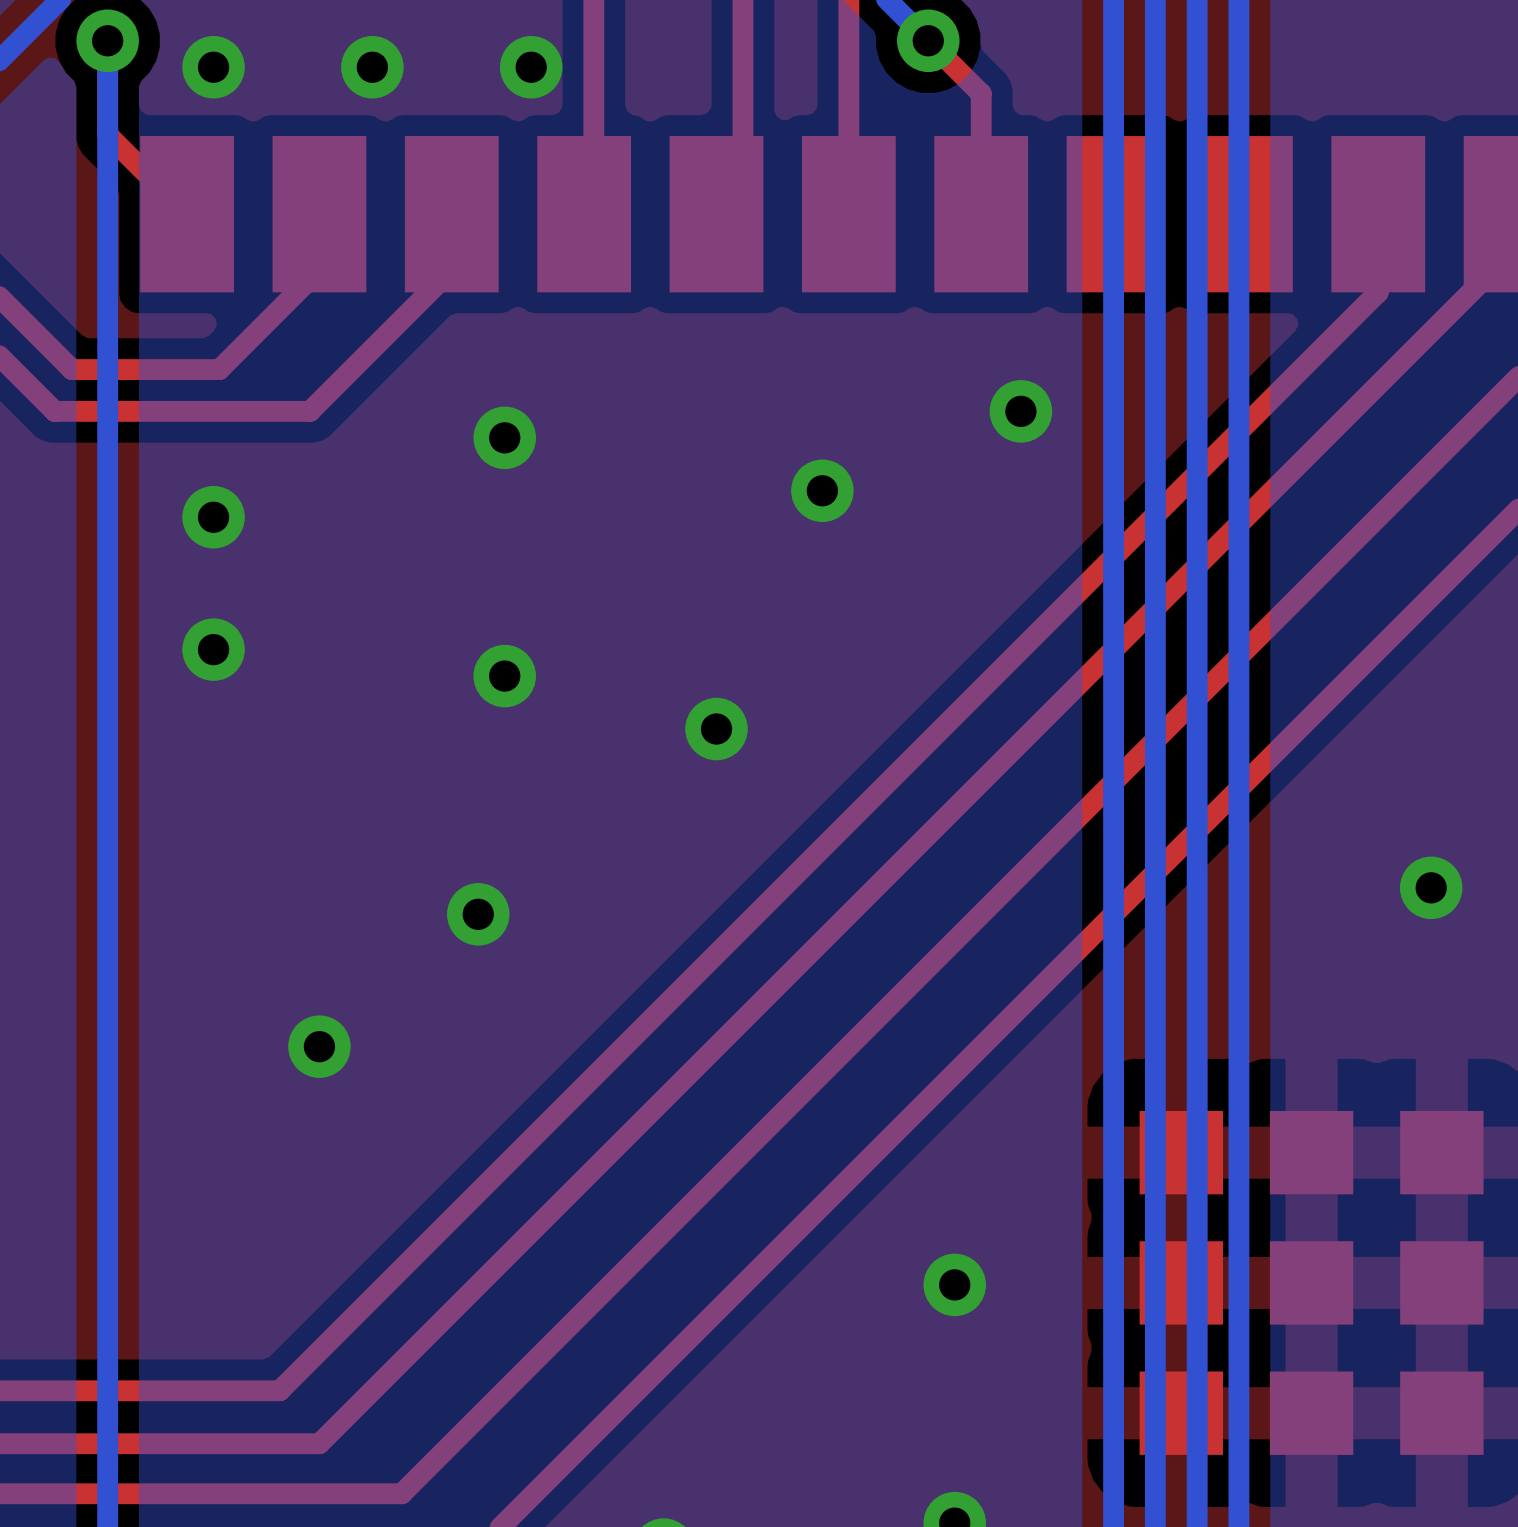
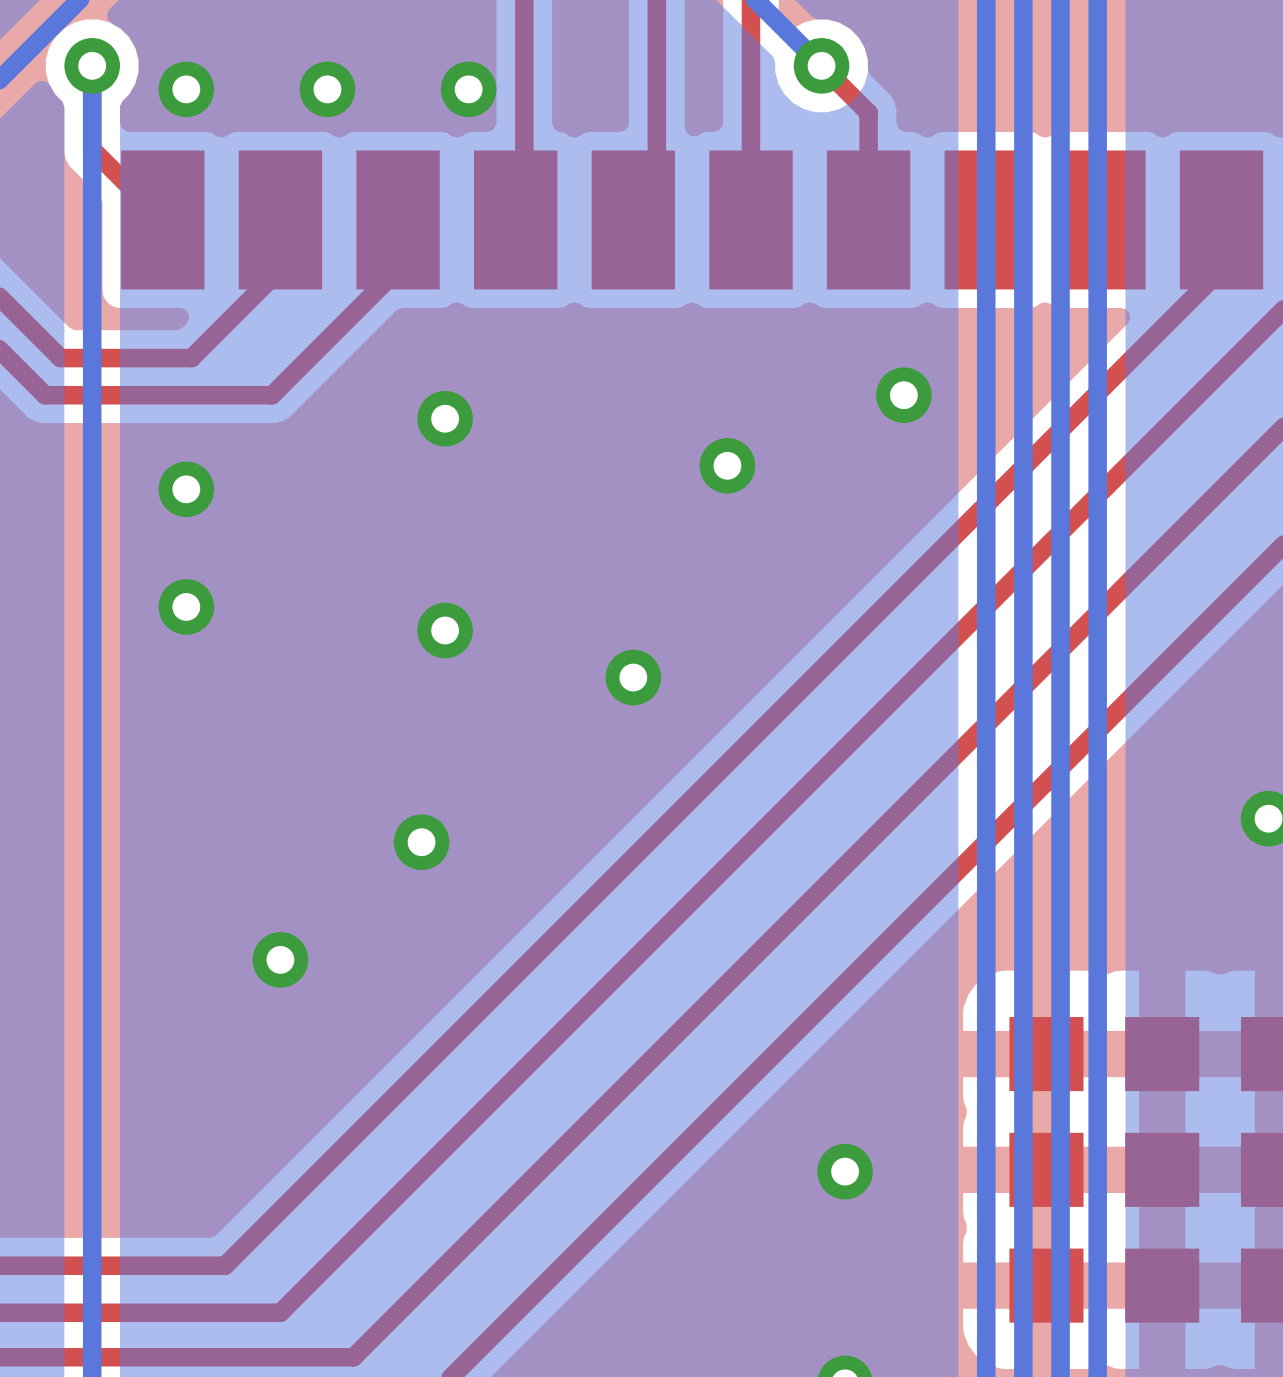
top track: (1378, 269) (1378, 292) (279, 1390) (257, 1390) -> (1221, 269) (225, 1265)

